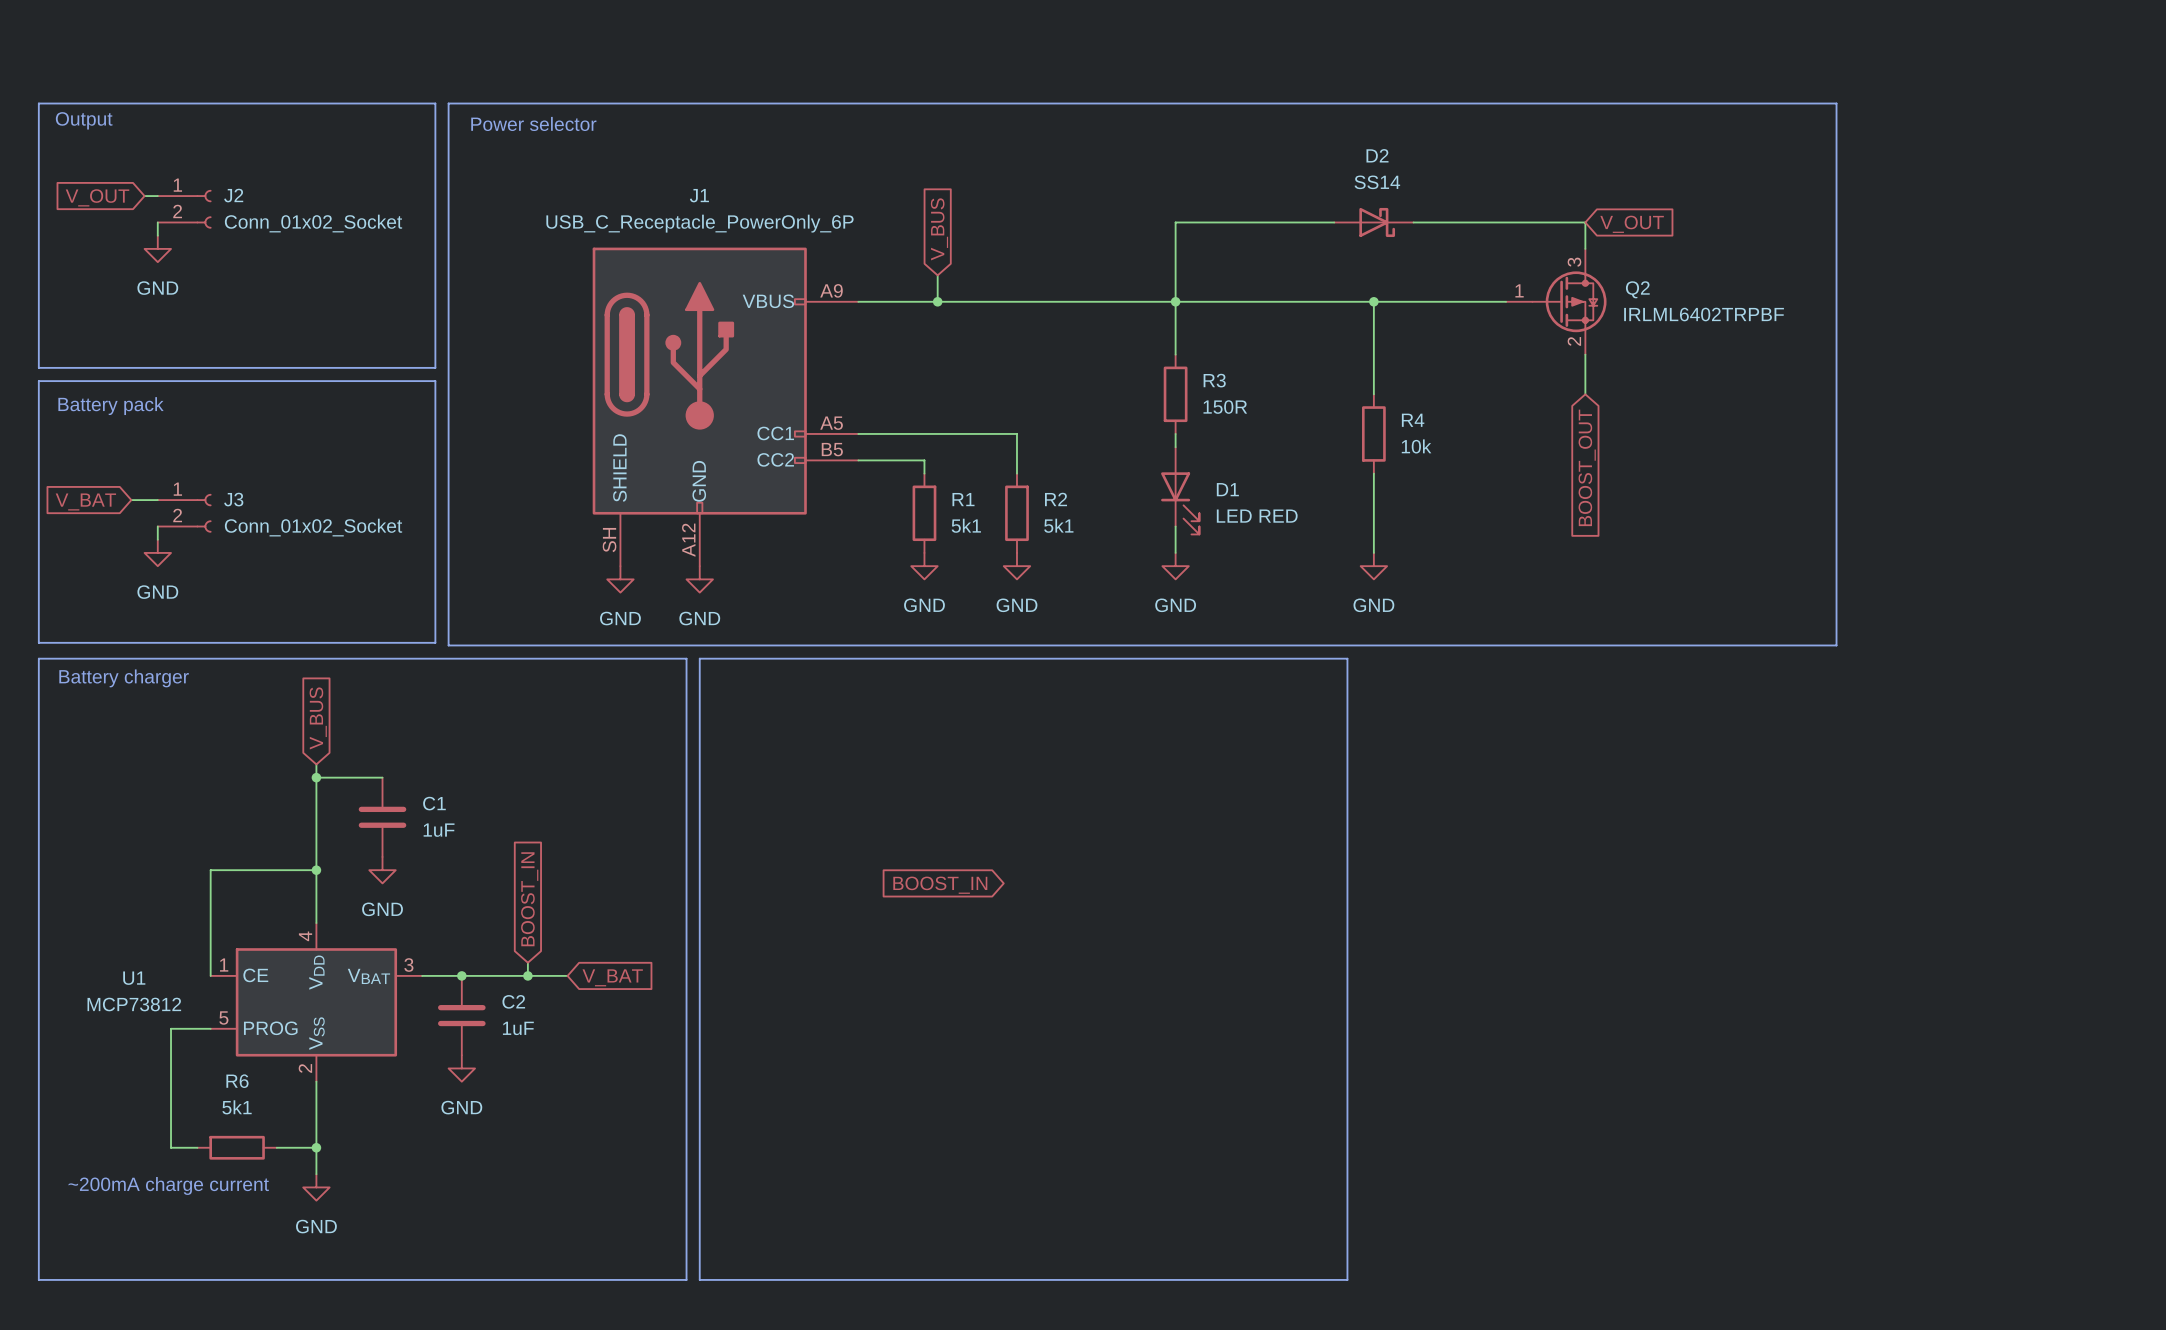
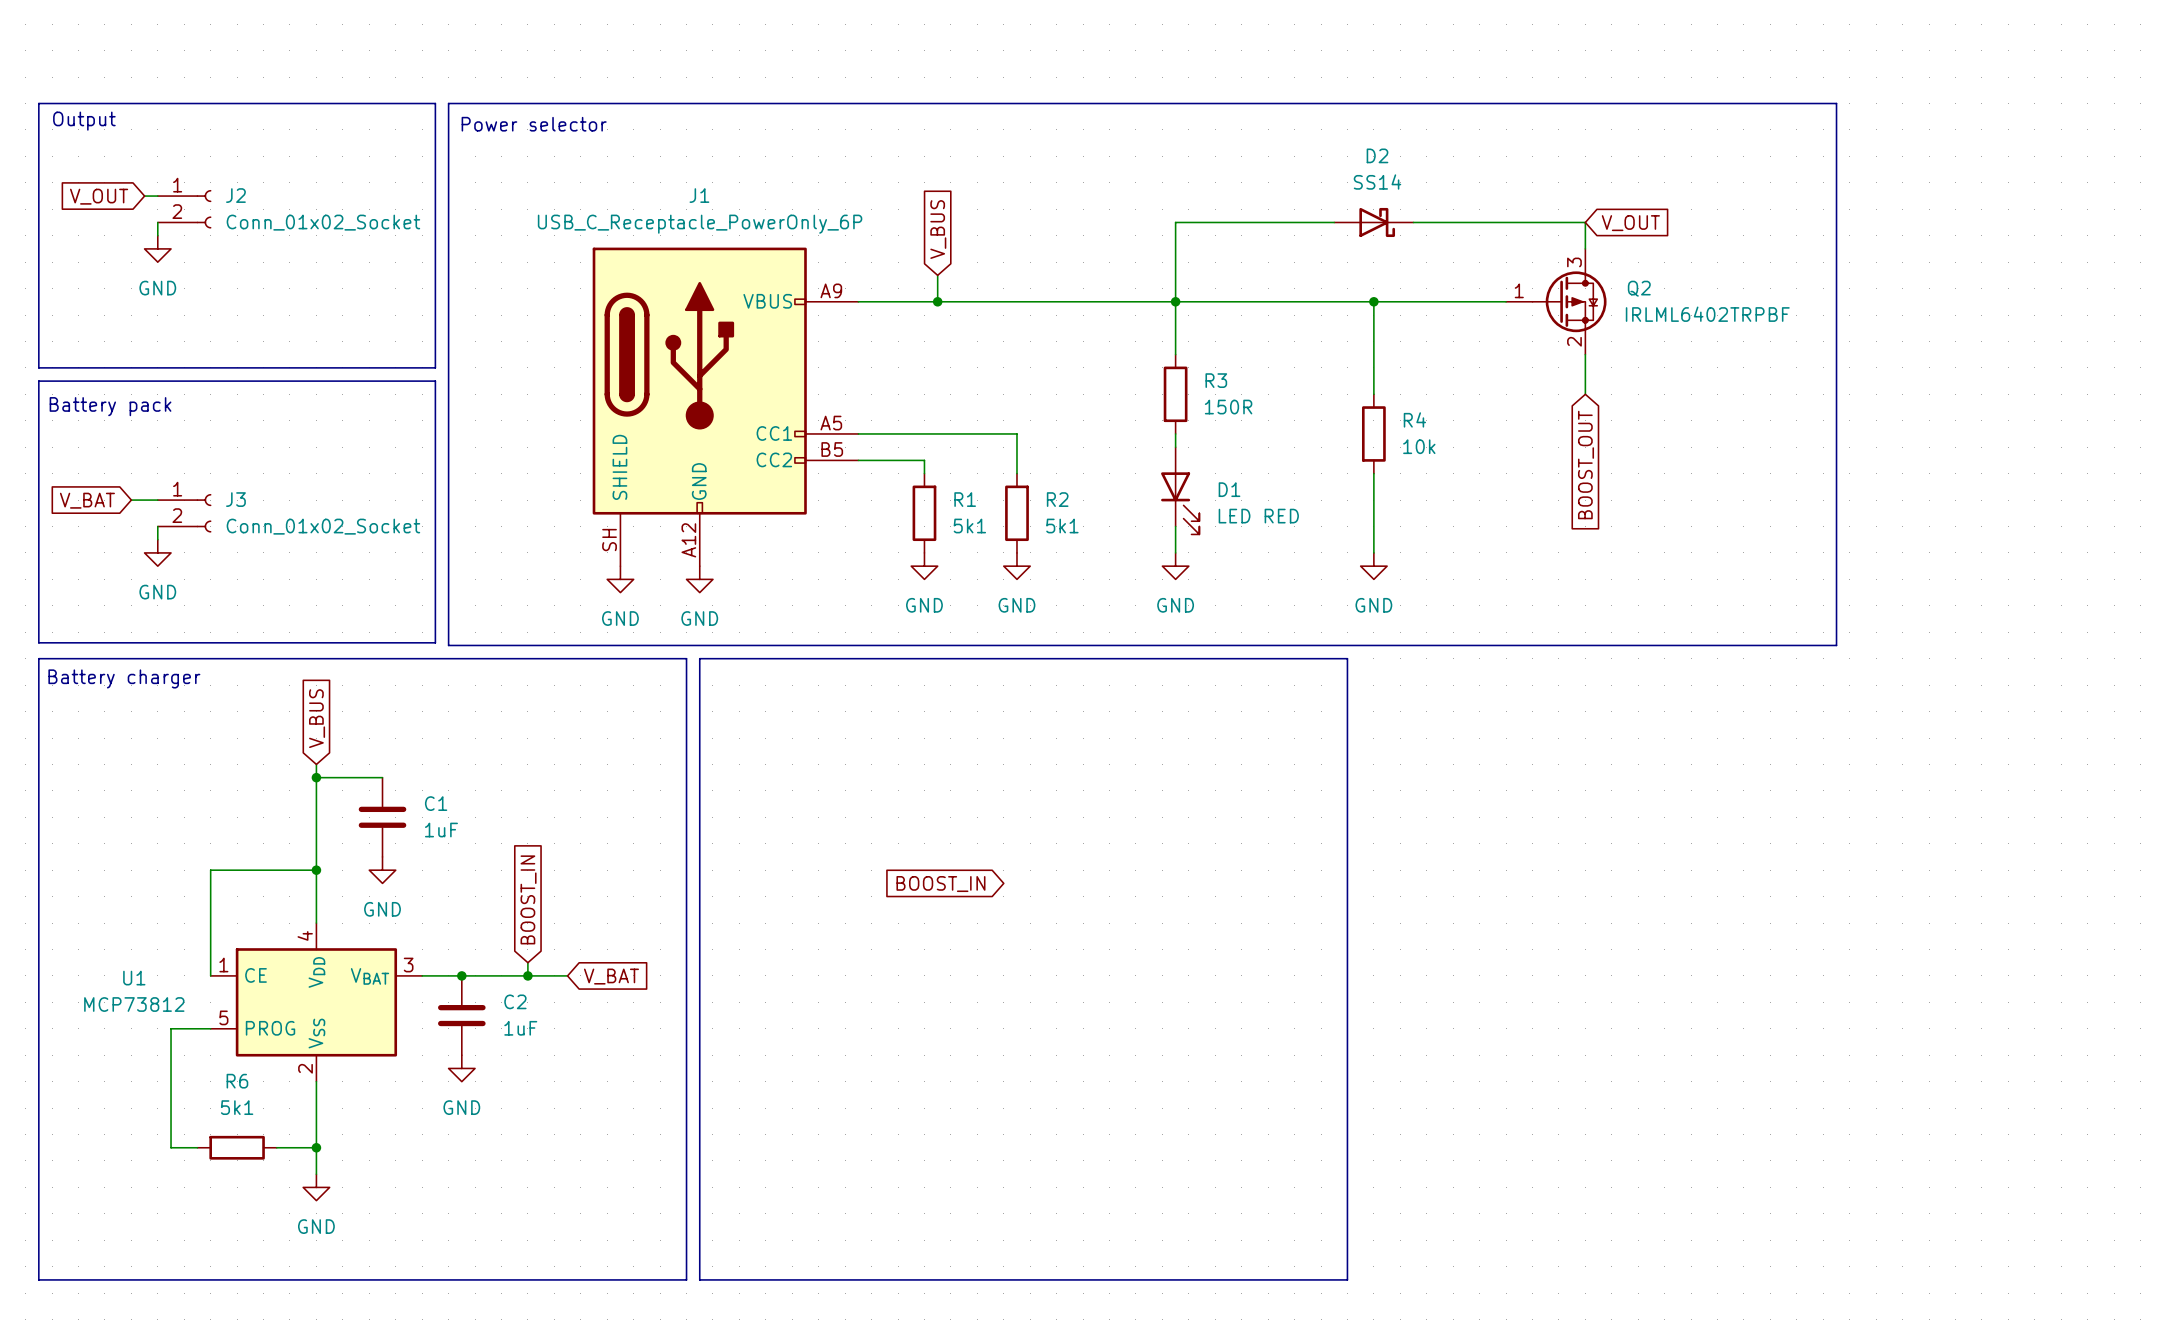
text: ~200mA charge current (168, 1185) -> none

